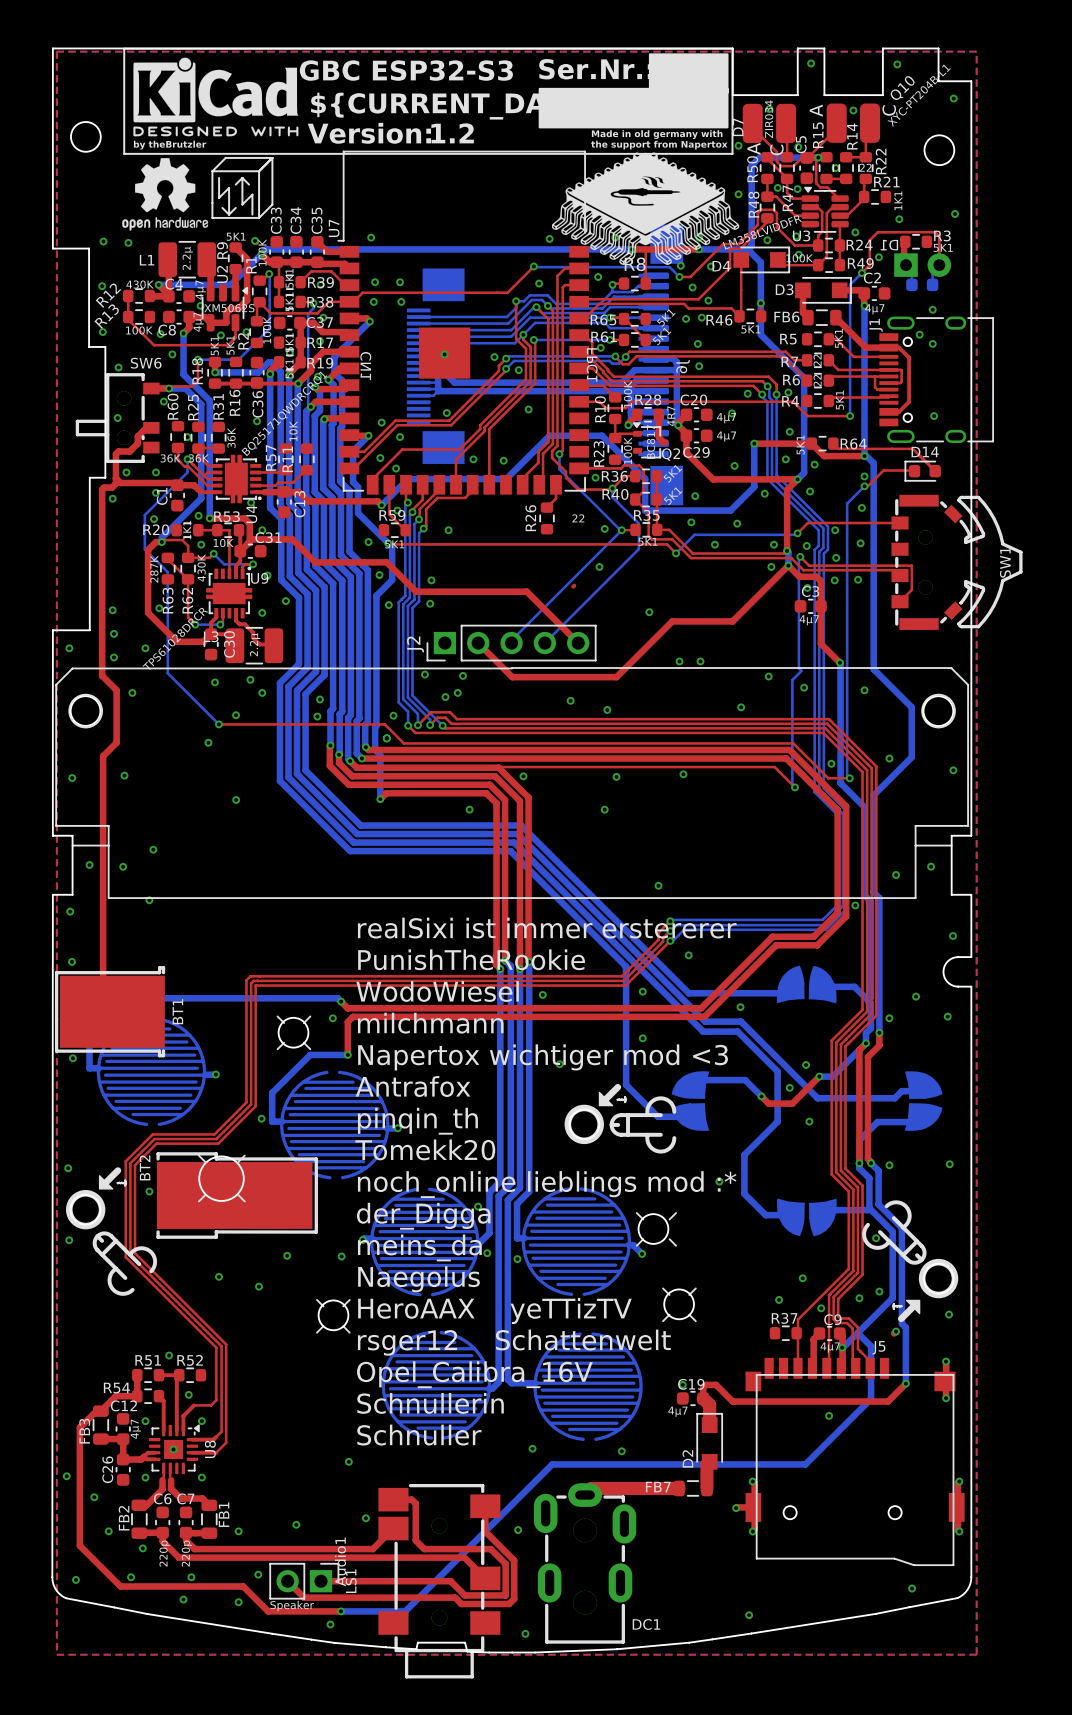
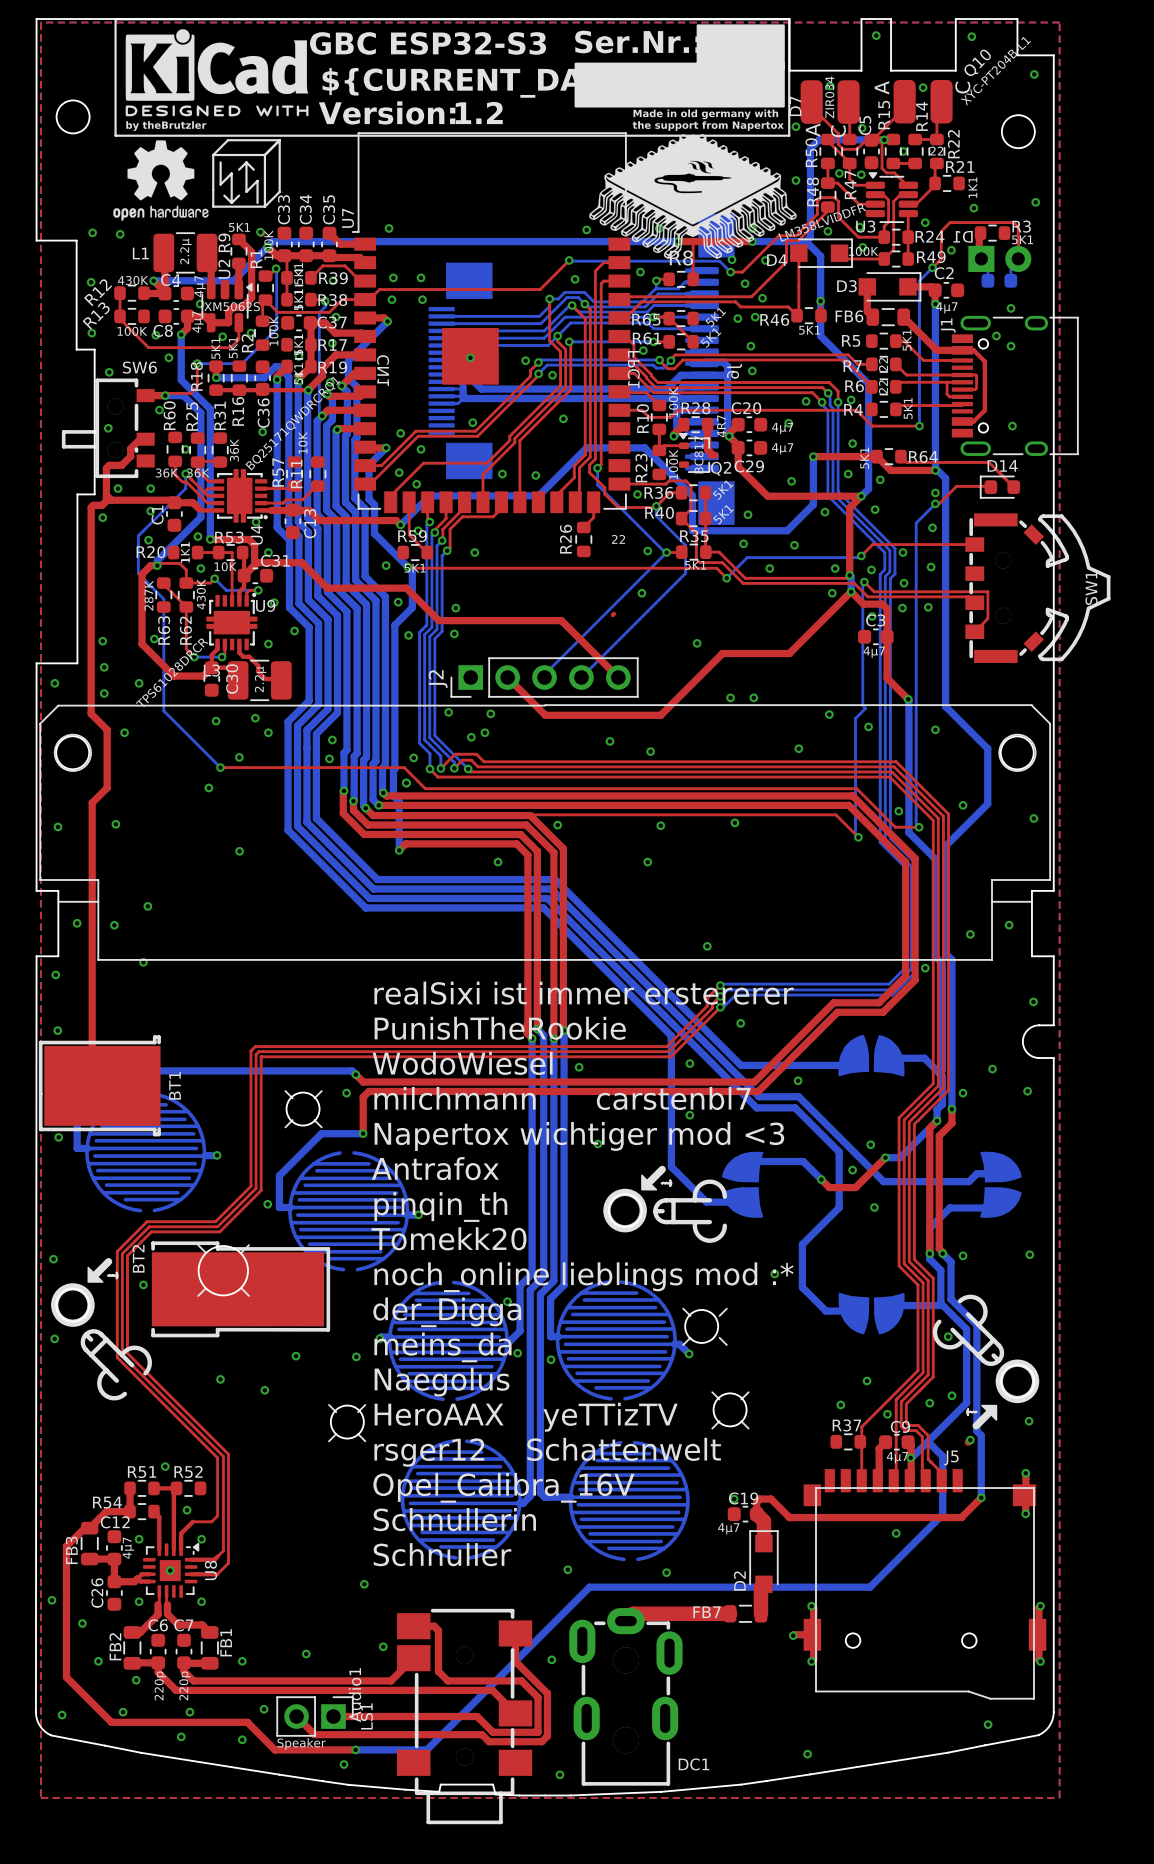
text: milchmann (430, 1023) -> milchmann carstenbl7 (562, 1098)

